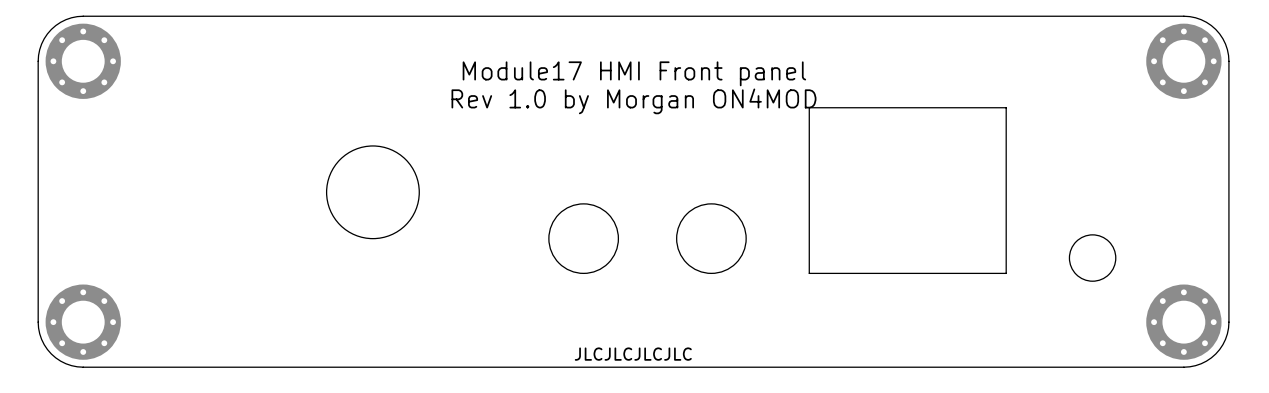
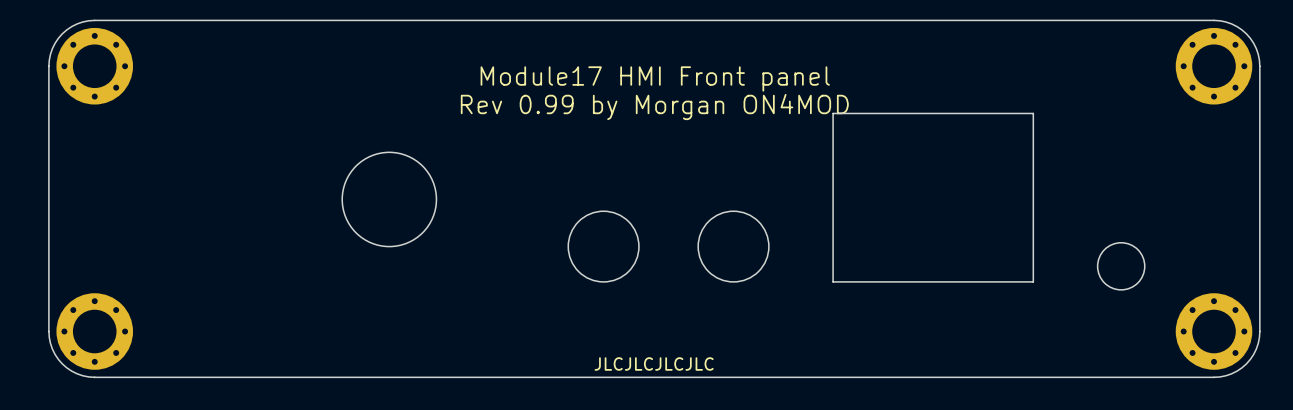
text: Rev 1.0 by Morgan ON4MOD (633, 101) -> Rev 0.99 by Morgan ON4MOD (654, 107)

